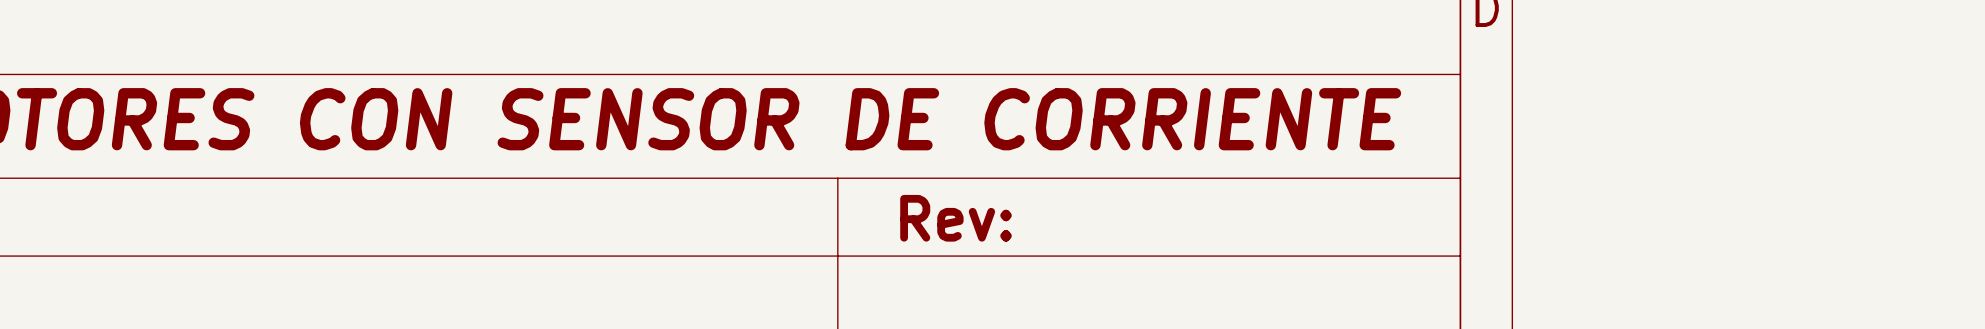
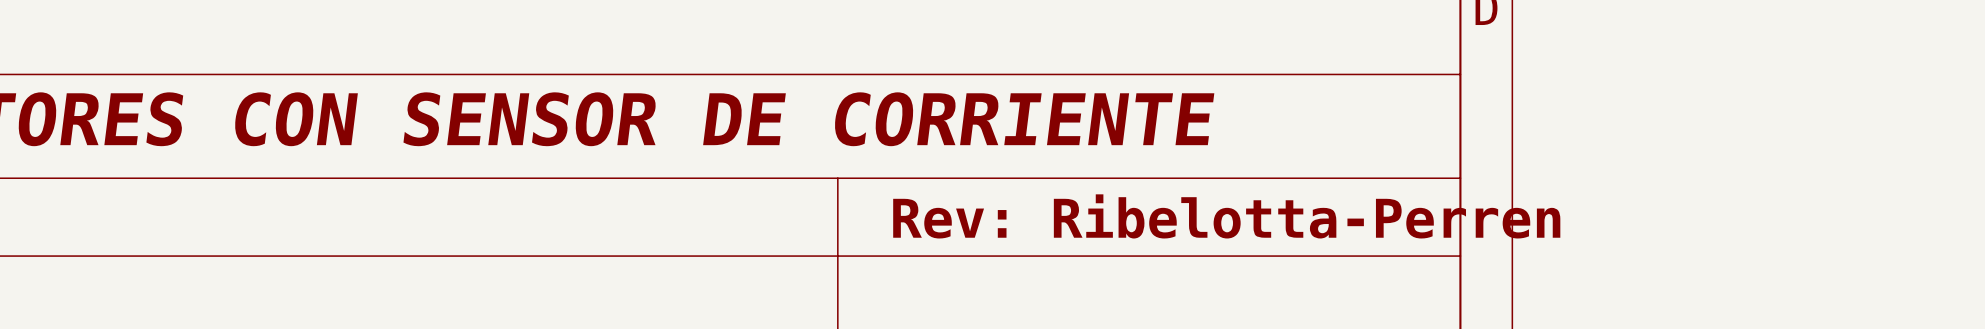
title block: Rev: (955, 218) -> Rev: Ribelotta-Perren (1226, 216)

